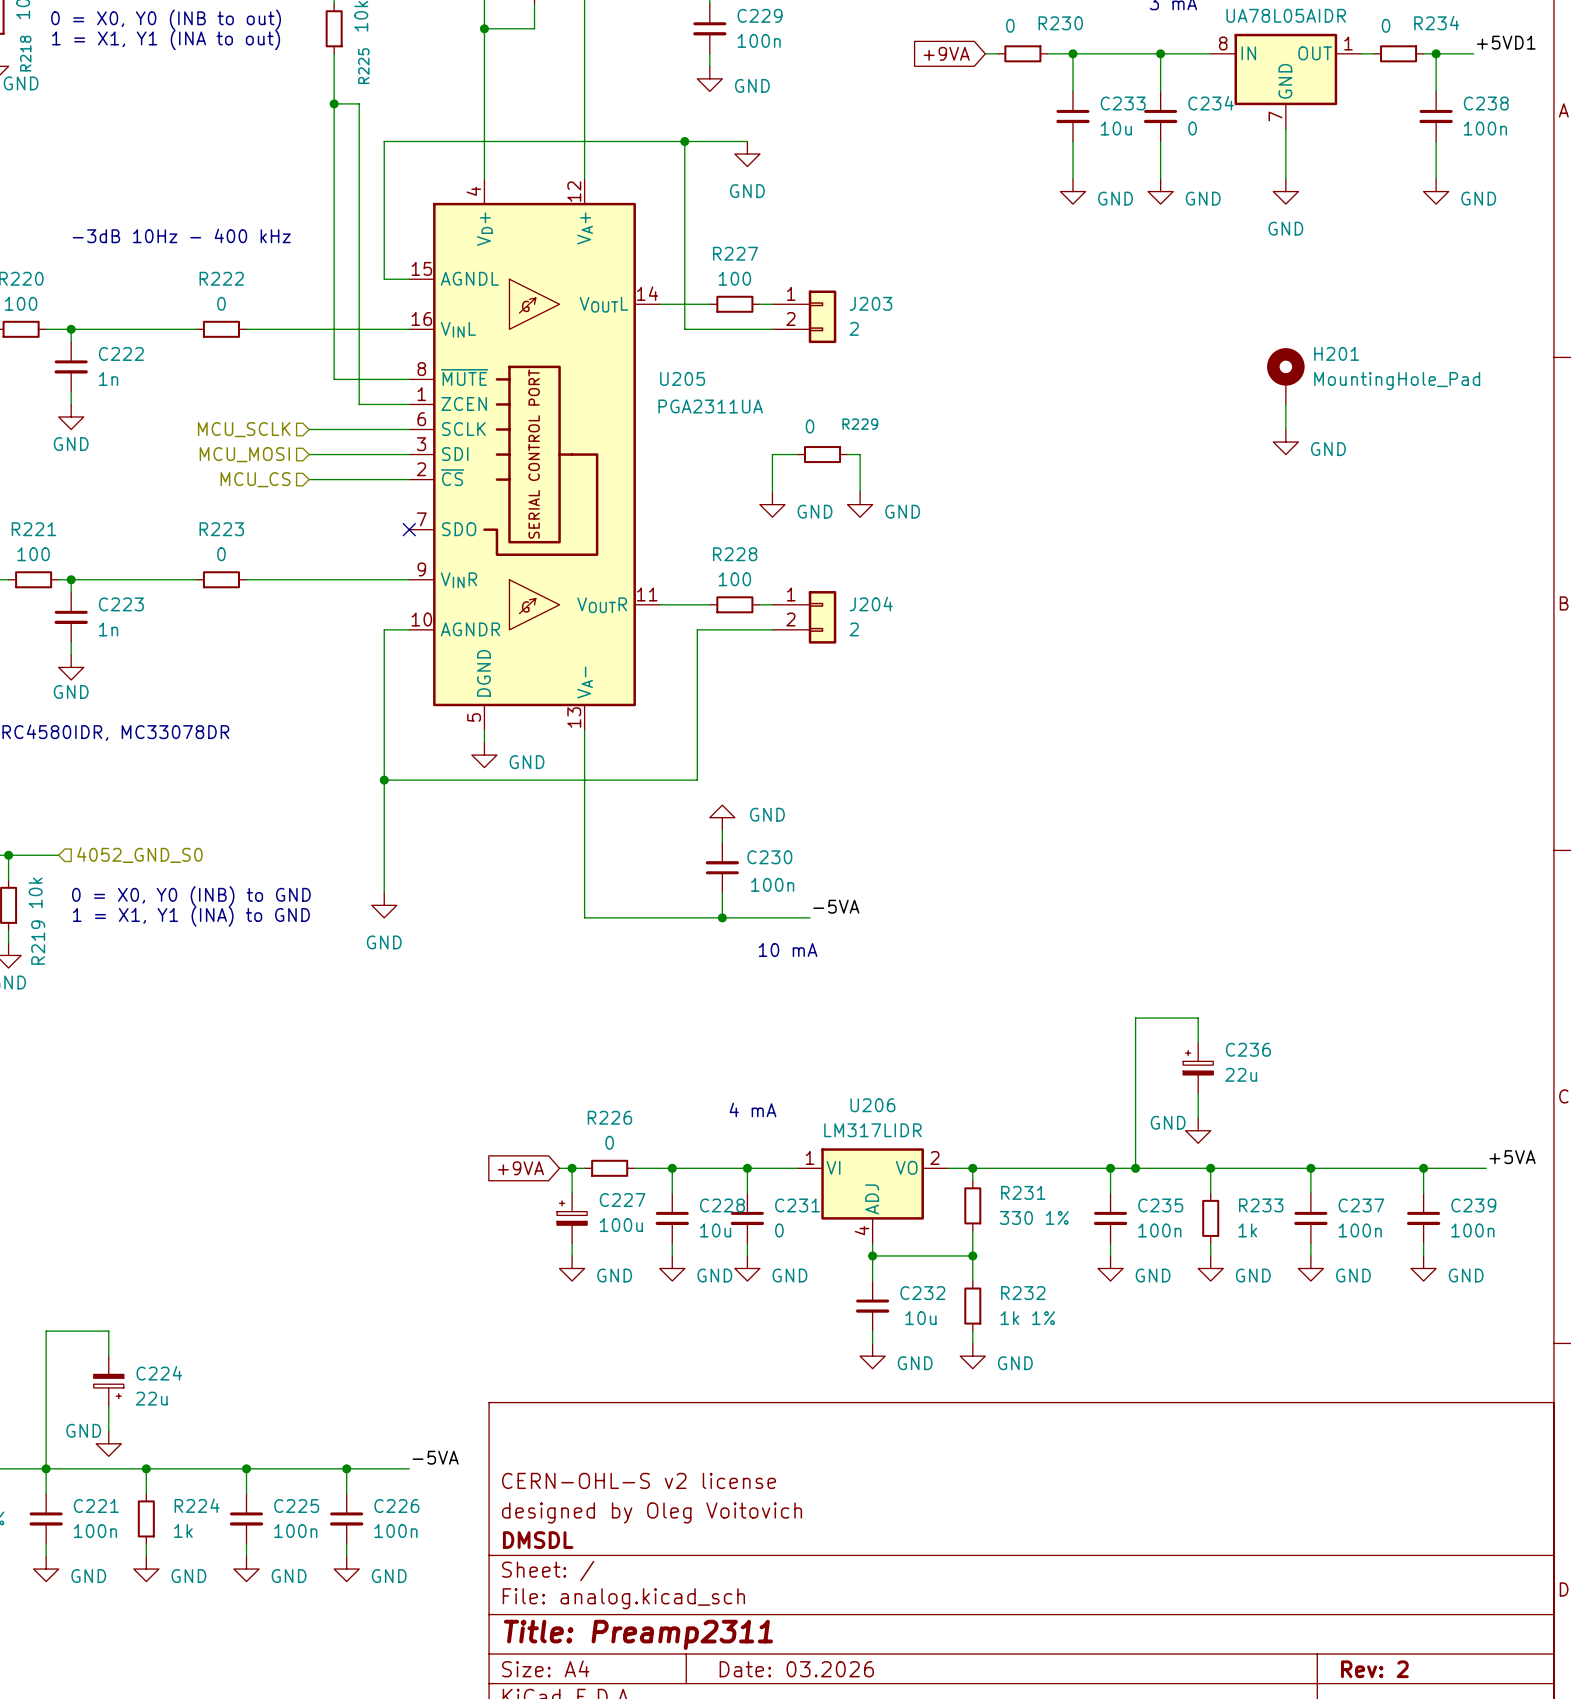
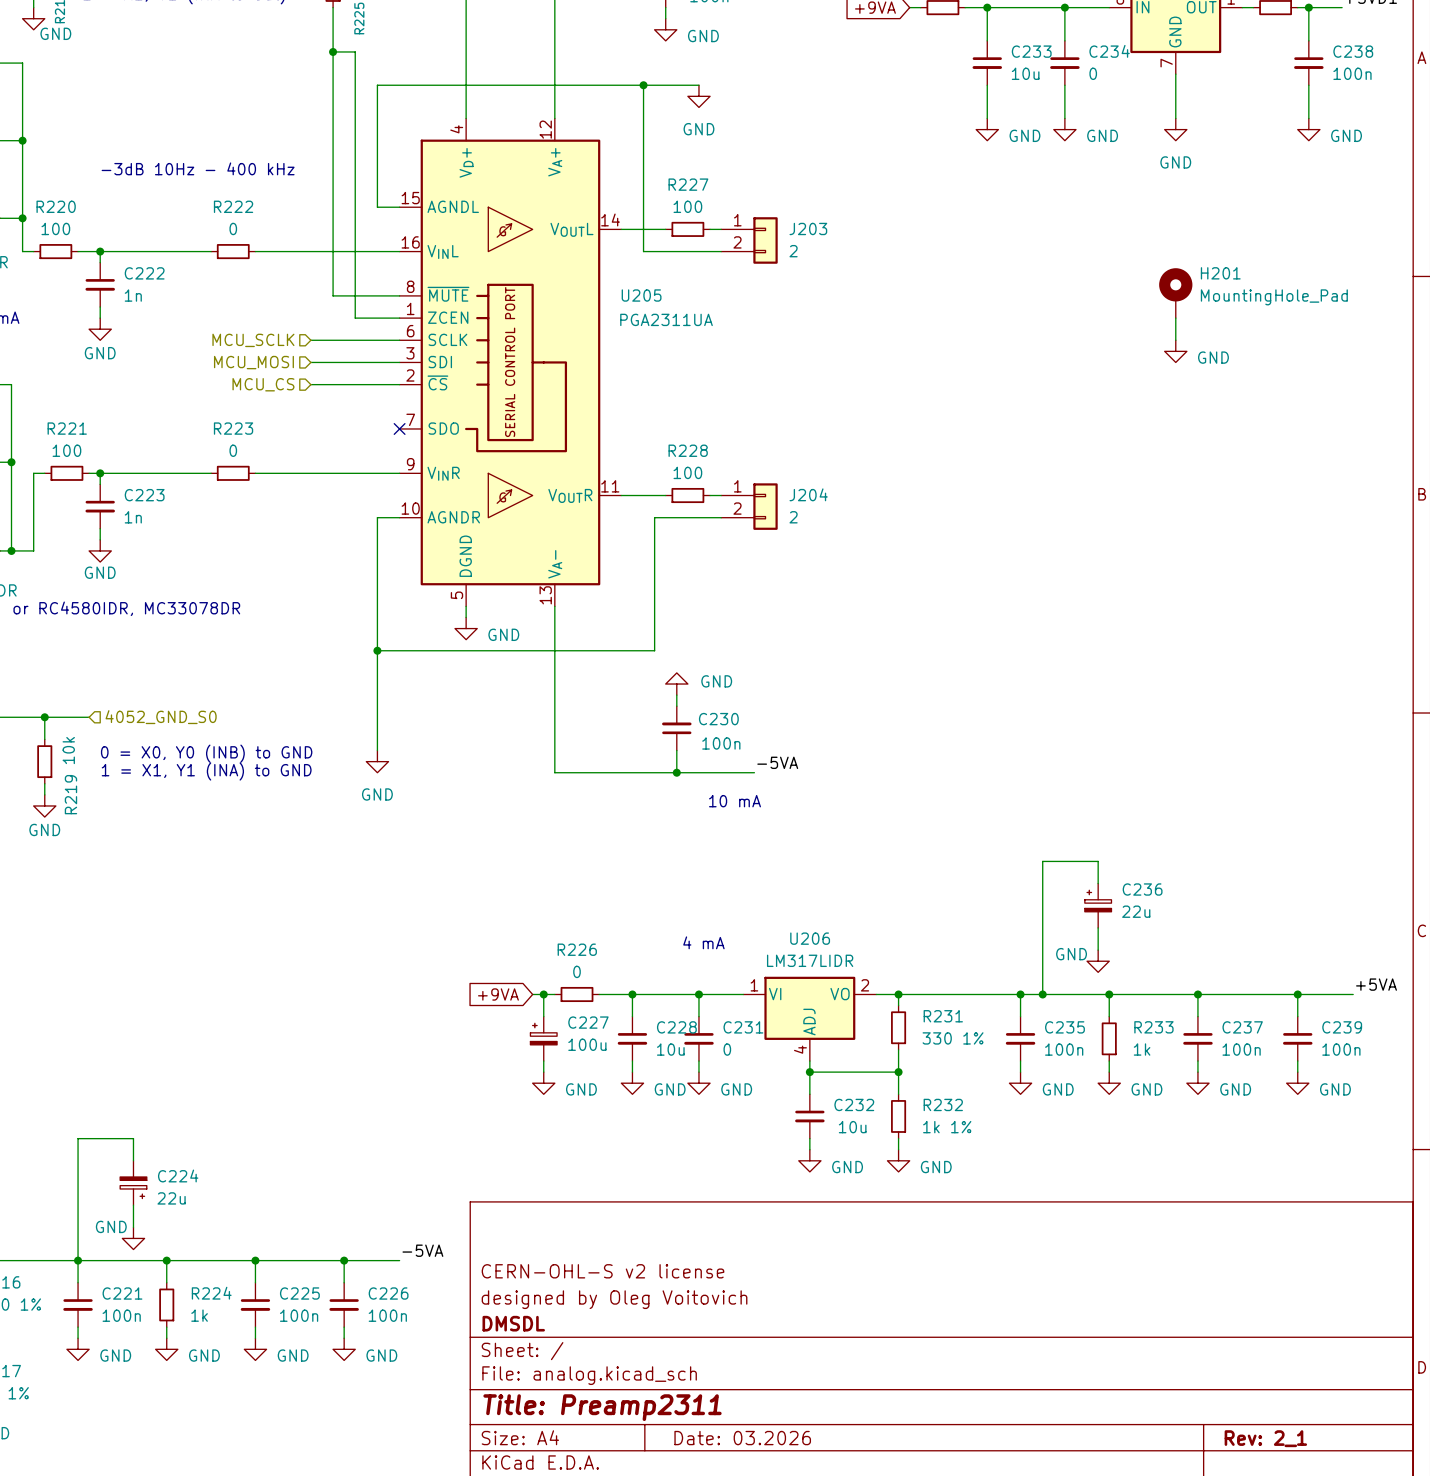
wire: (797, 454) (772, 454) (772, 492) -> none
R229: 0 (822, 454) -> none
wire: (847, 454) (860, 454) (860, 492) -> none
power symbol: GND (772, 504) -> none
power symbol: GND (860, 504) -> none
title block: Rev: 2 (1374, 1669) -> Rev: 2_1 (1265, 1438)

